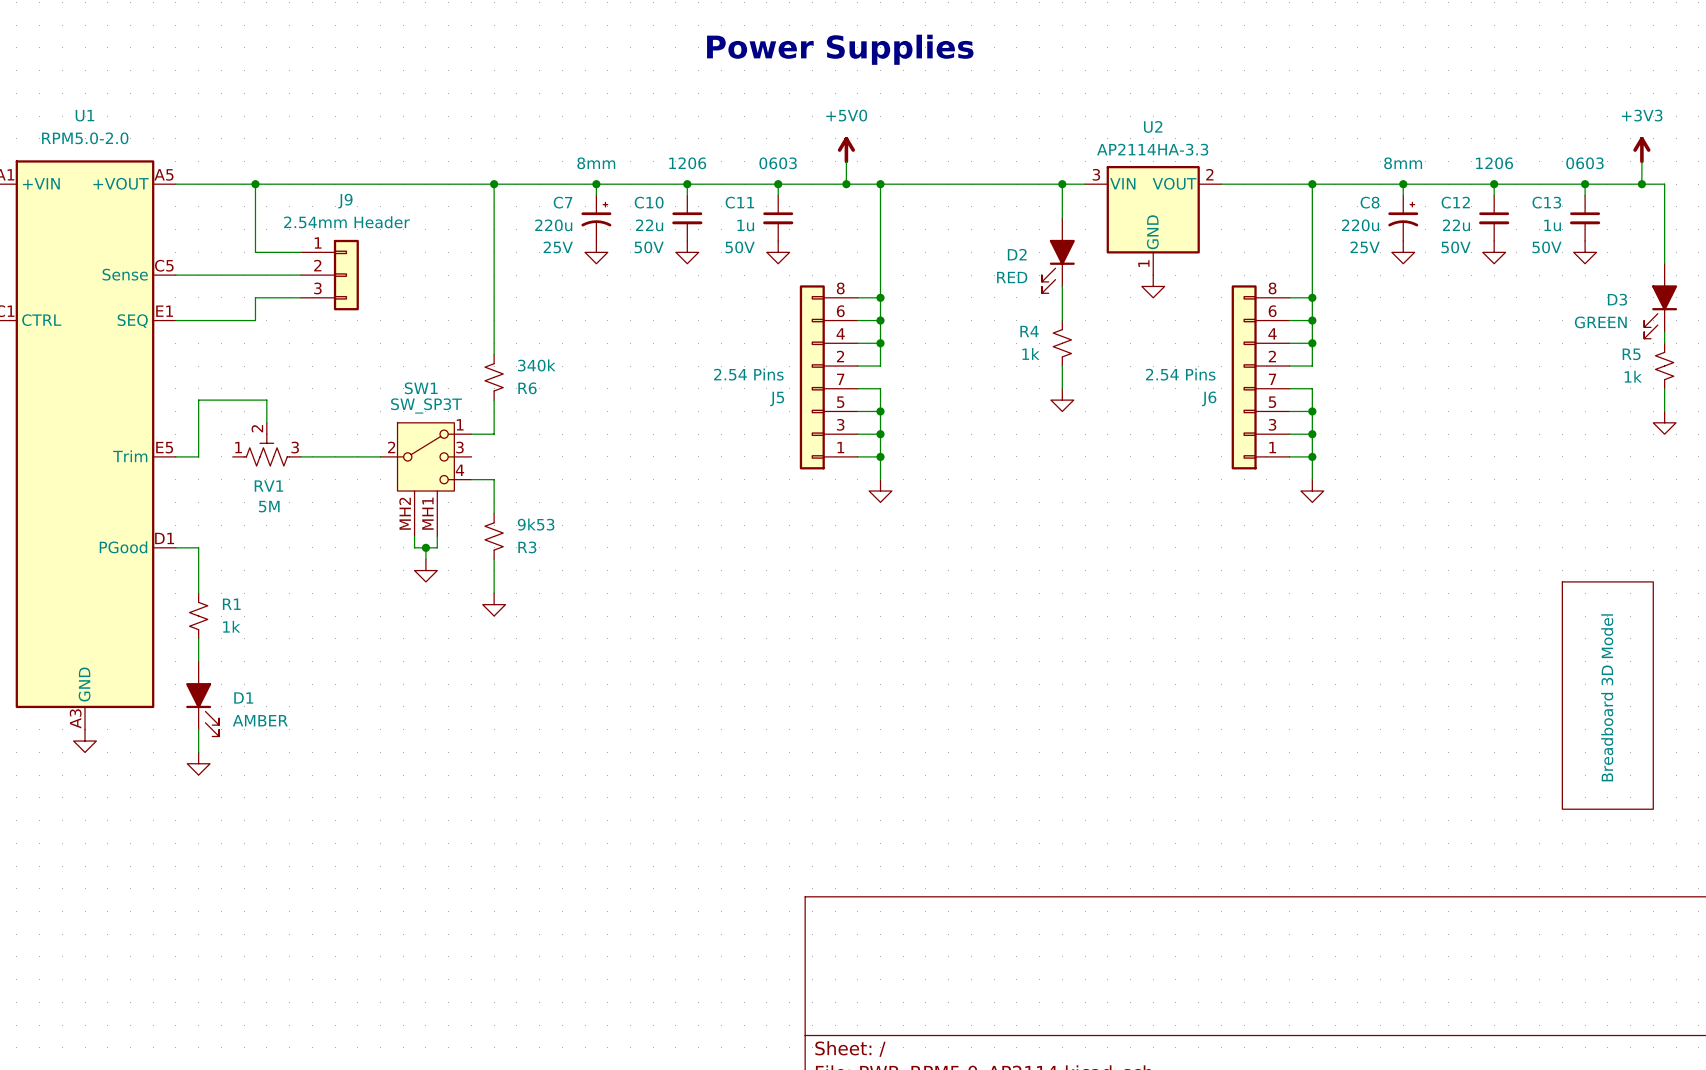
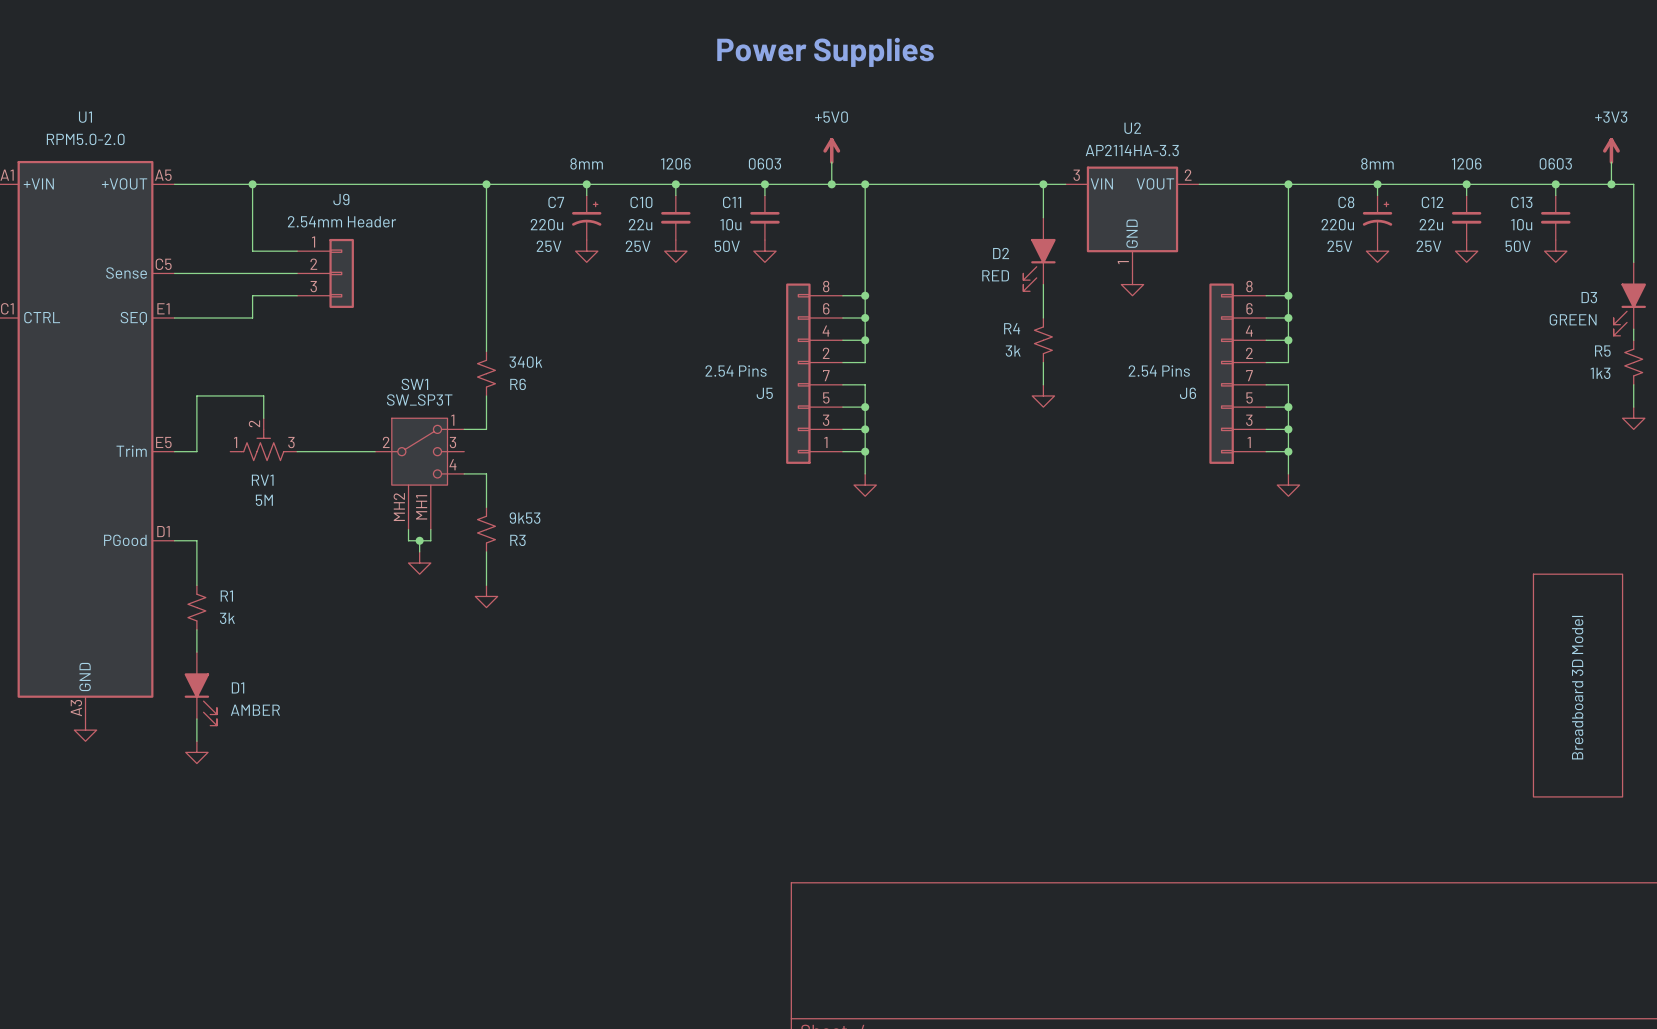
C11 value: 1u (745, 225) -> 10u (730, 224)
C13 value: 1u (1552, 225) -> 10u (1521, 224)
C10 text: 50V (649, 247) -> 25V (638, 246)
C12 text: 50V (1456, 247) -> 25V (1428, 246)
R4 value: 1k (1030, 353) -> 3k (1013, 351)
R5 value: 1k (1633, 376) -> 1k3 (1600, 373)
R1 value: 1k (231, 626) -> 3k (227, 618)

